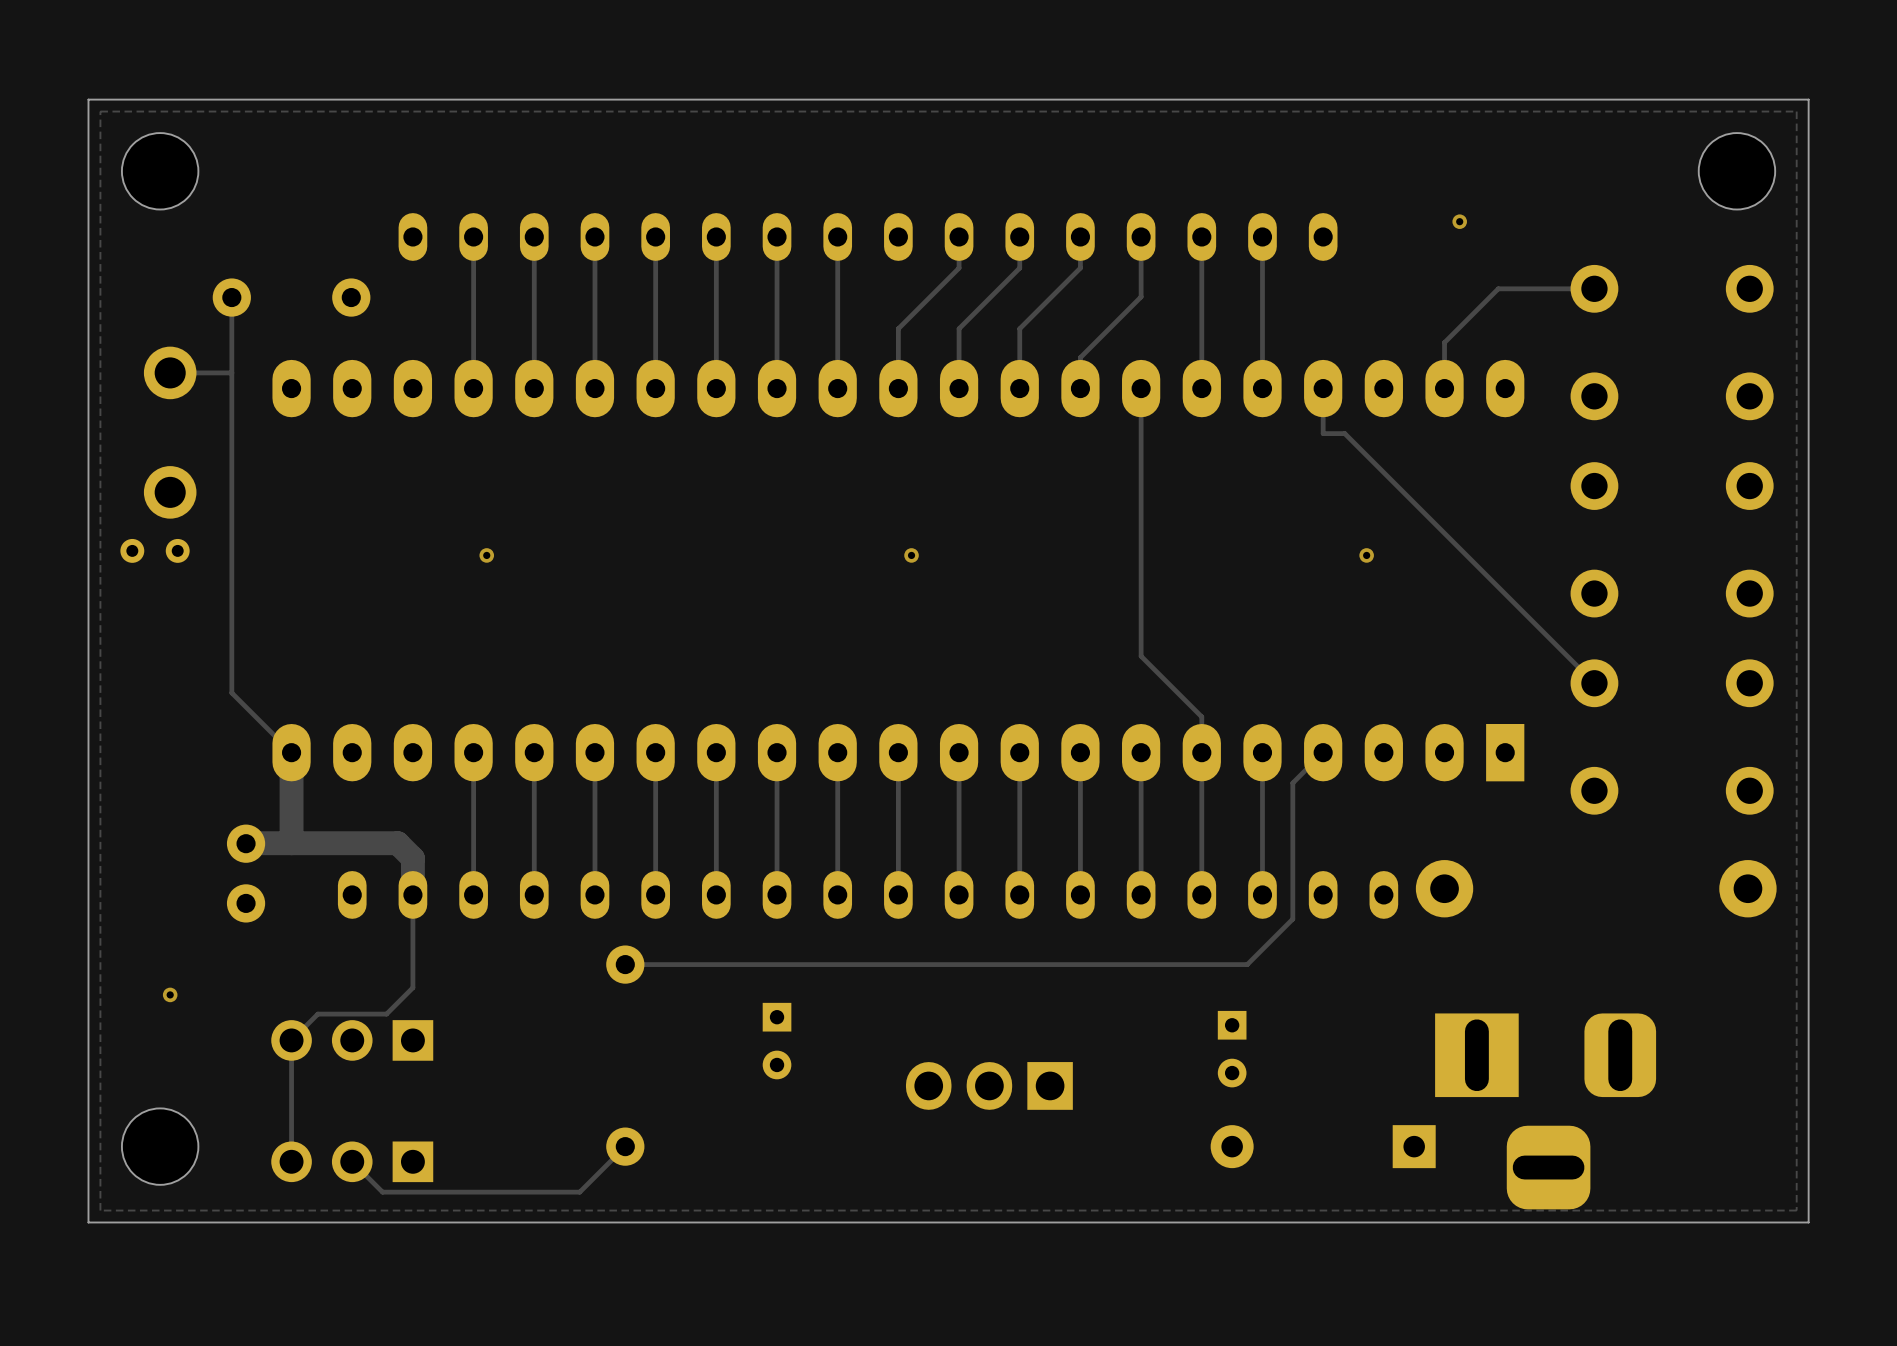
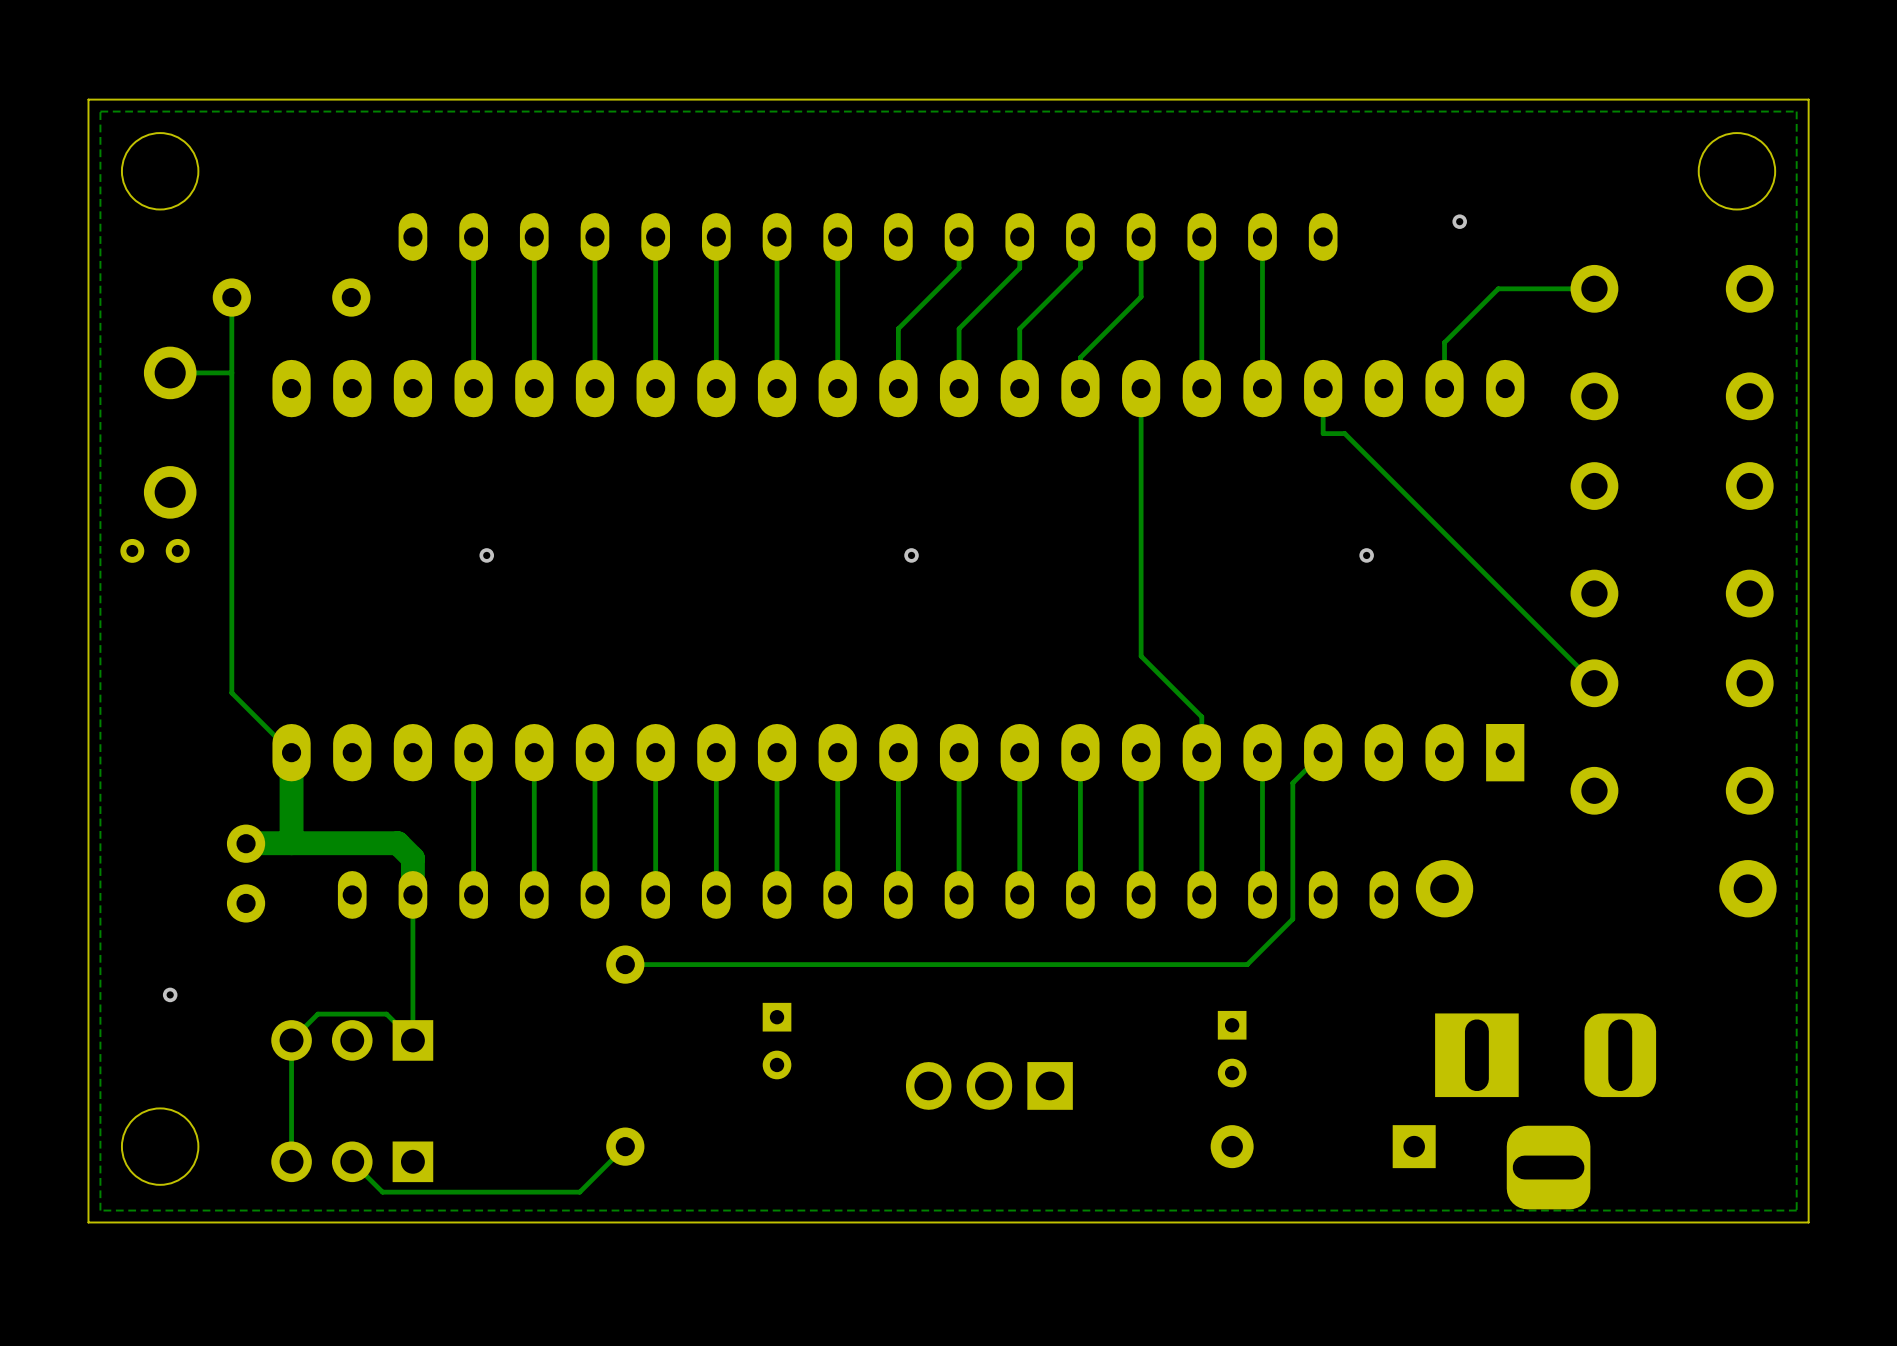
track: (412, 987) (386, 1014) -> (412, 987) (412, 1040) (386, 1014)

